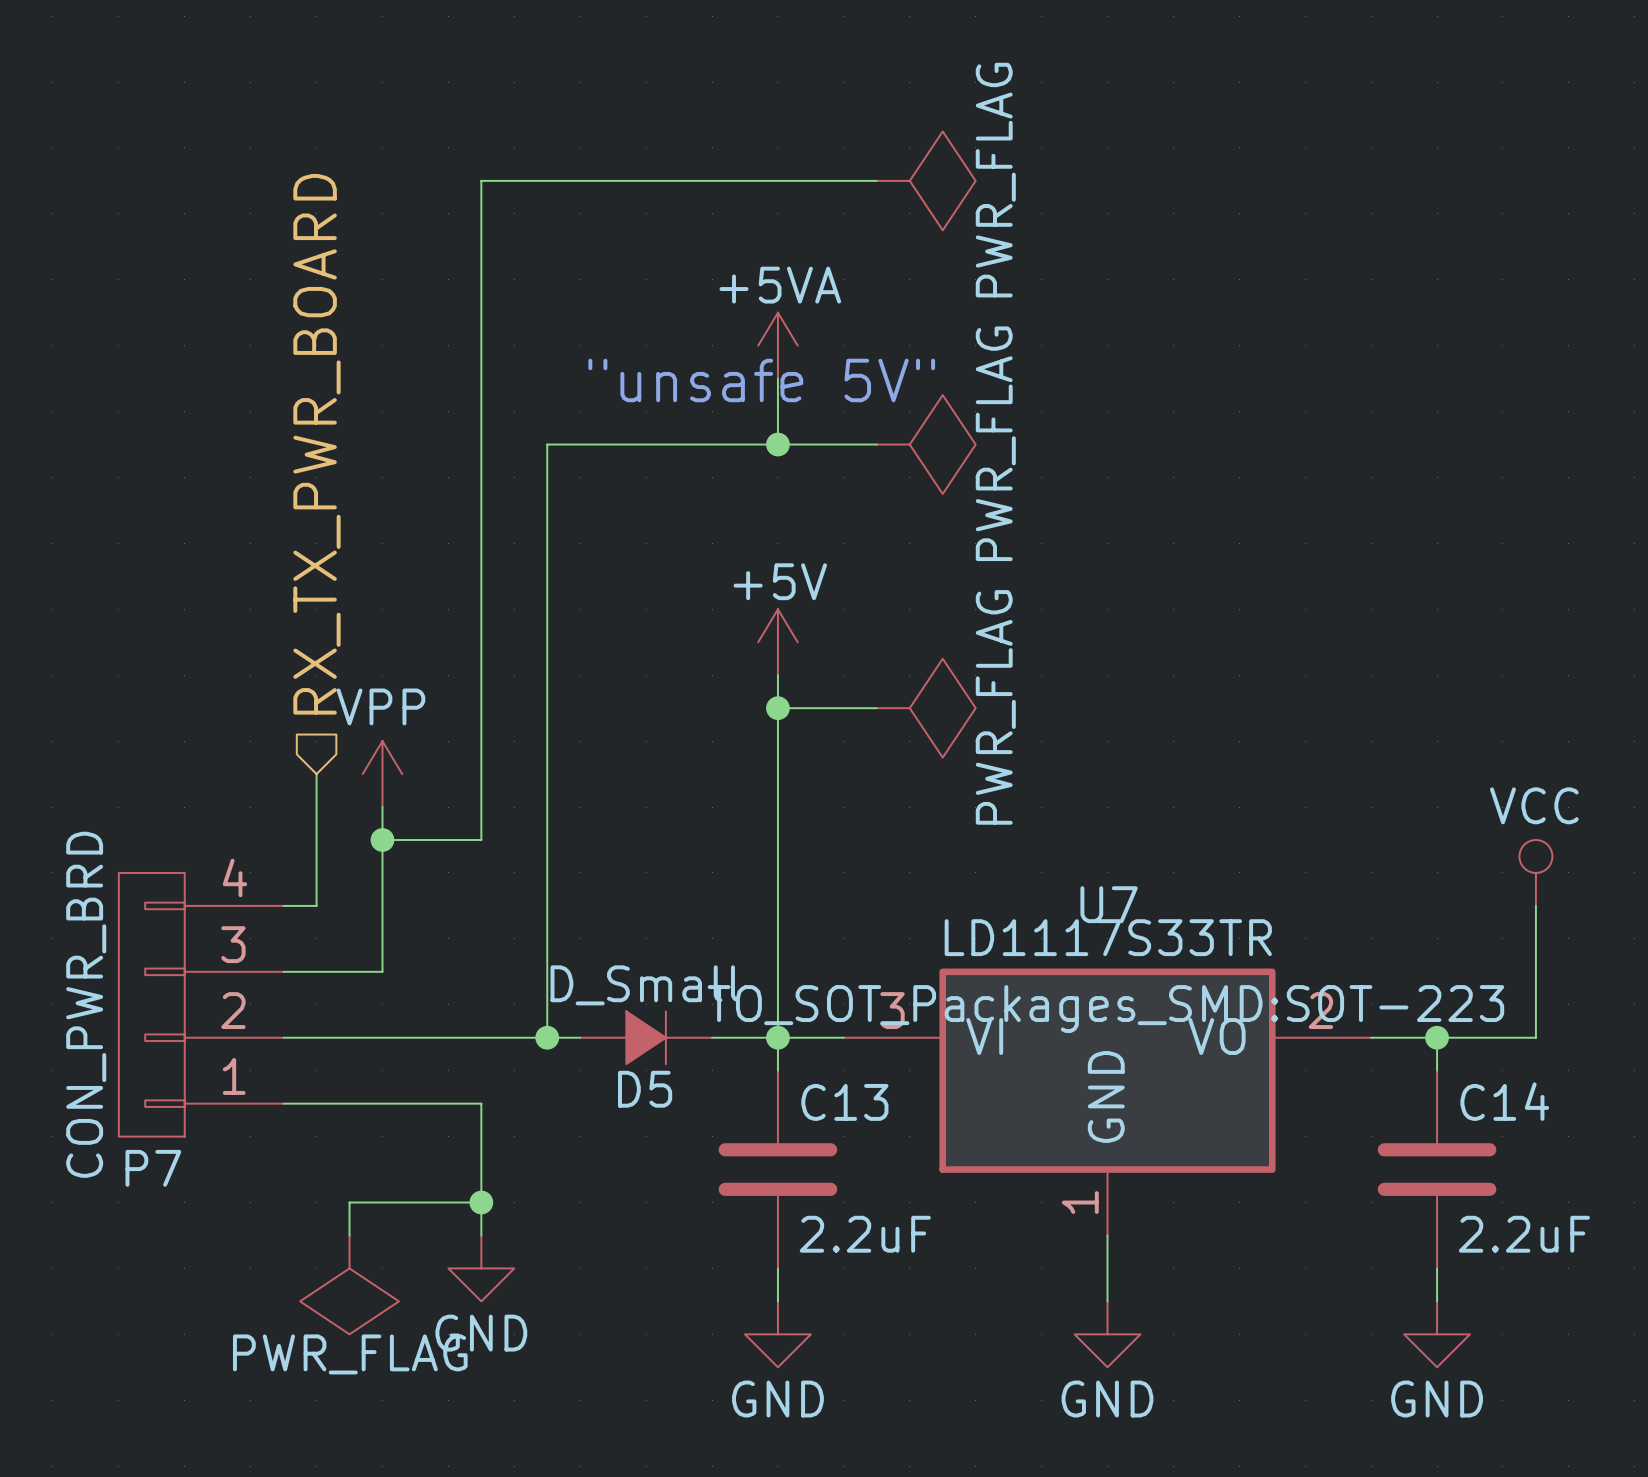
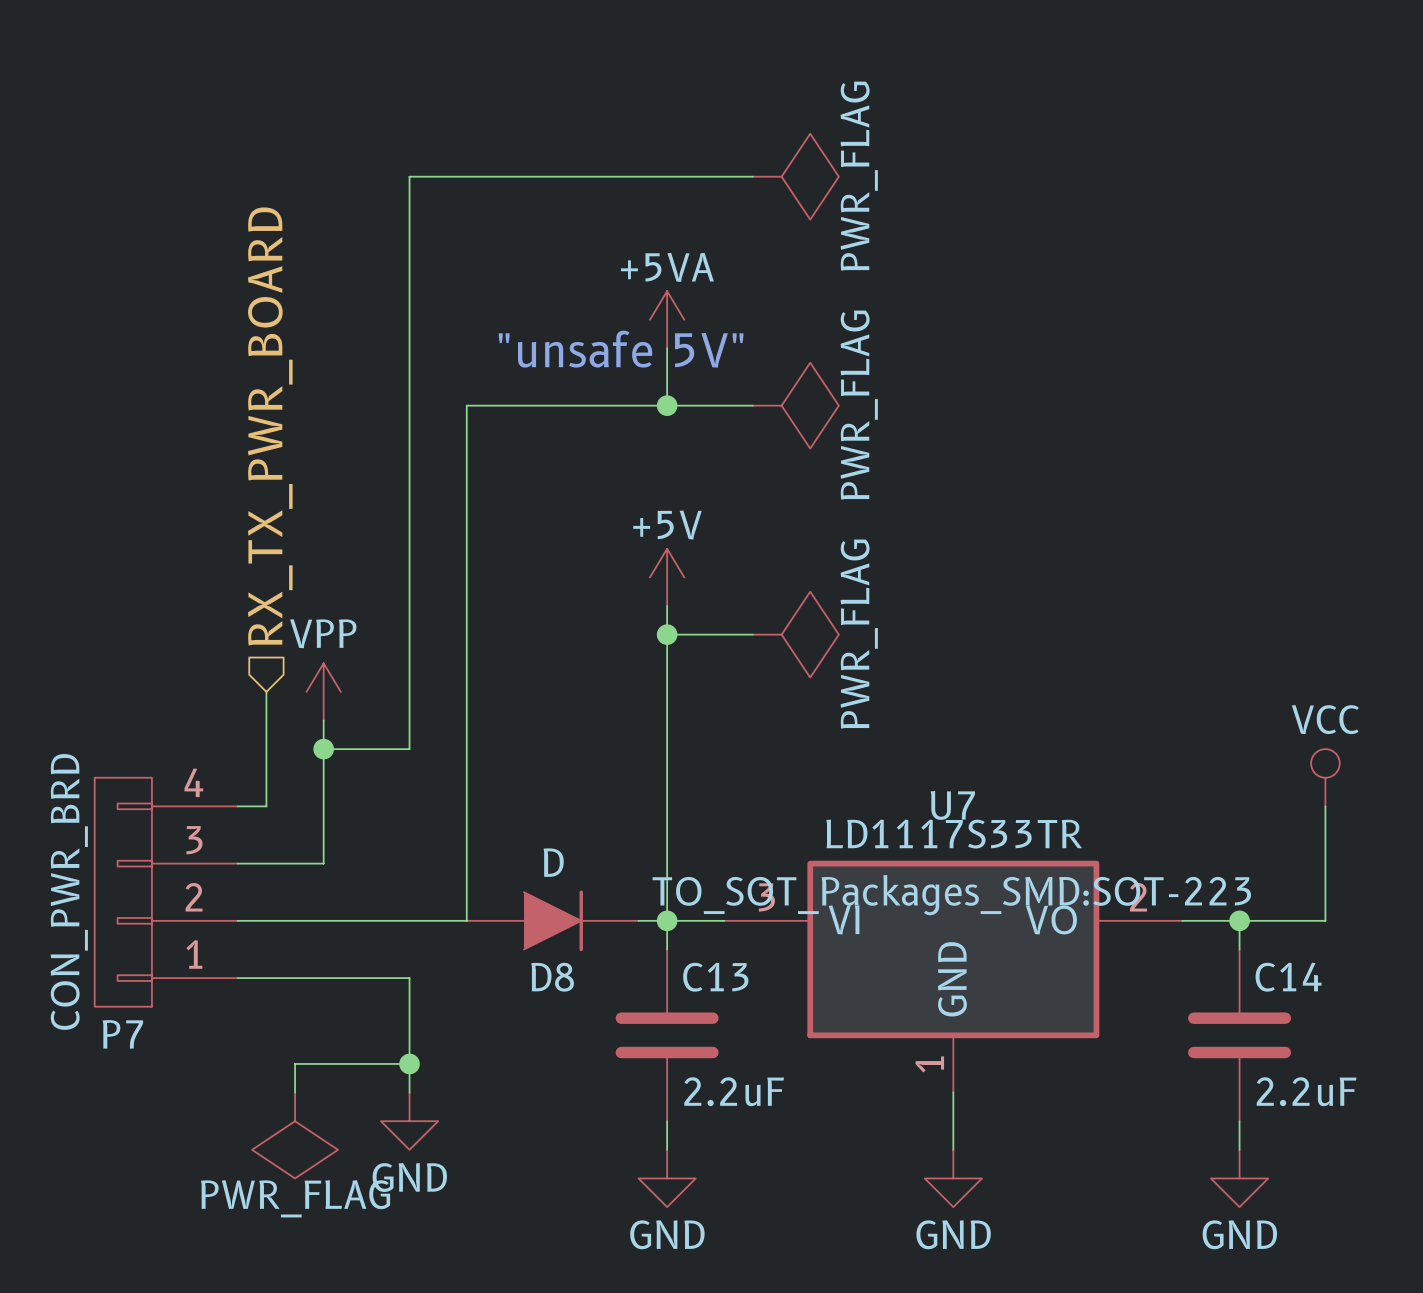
junction: (547, 1037) -> none
D5: D_Small (646, 1037) -> none
D8: none -> D (552, 920)

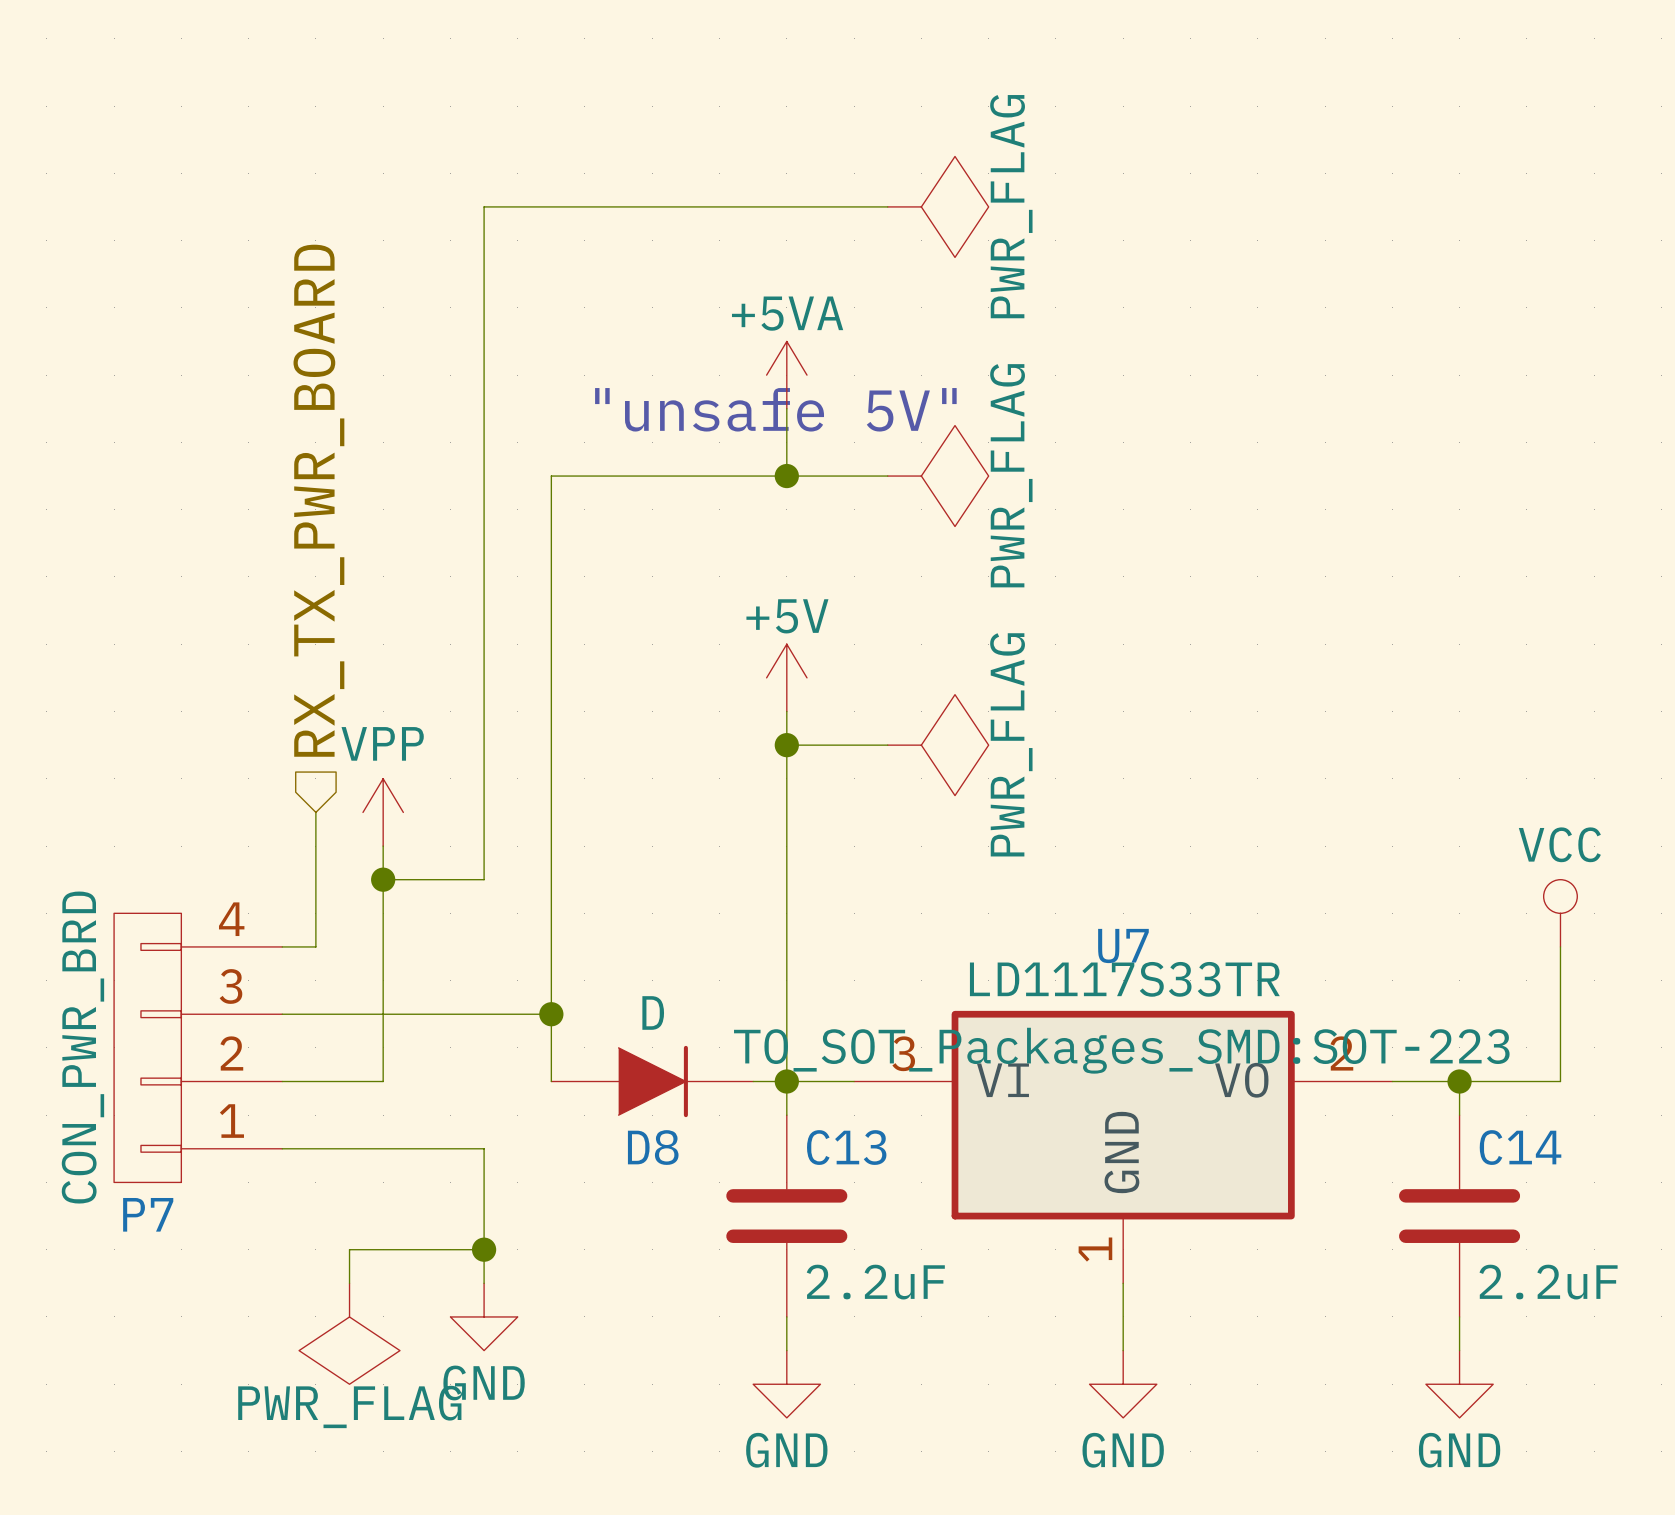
junction: none -> (551, 1014)
wire: (323, 920) (466, 920) -> (383, 1081) (383, 1014) (551, 1014)

